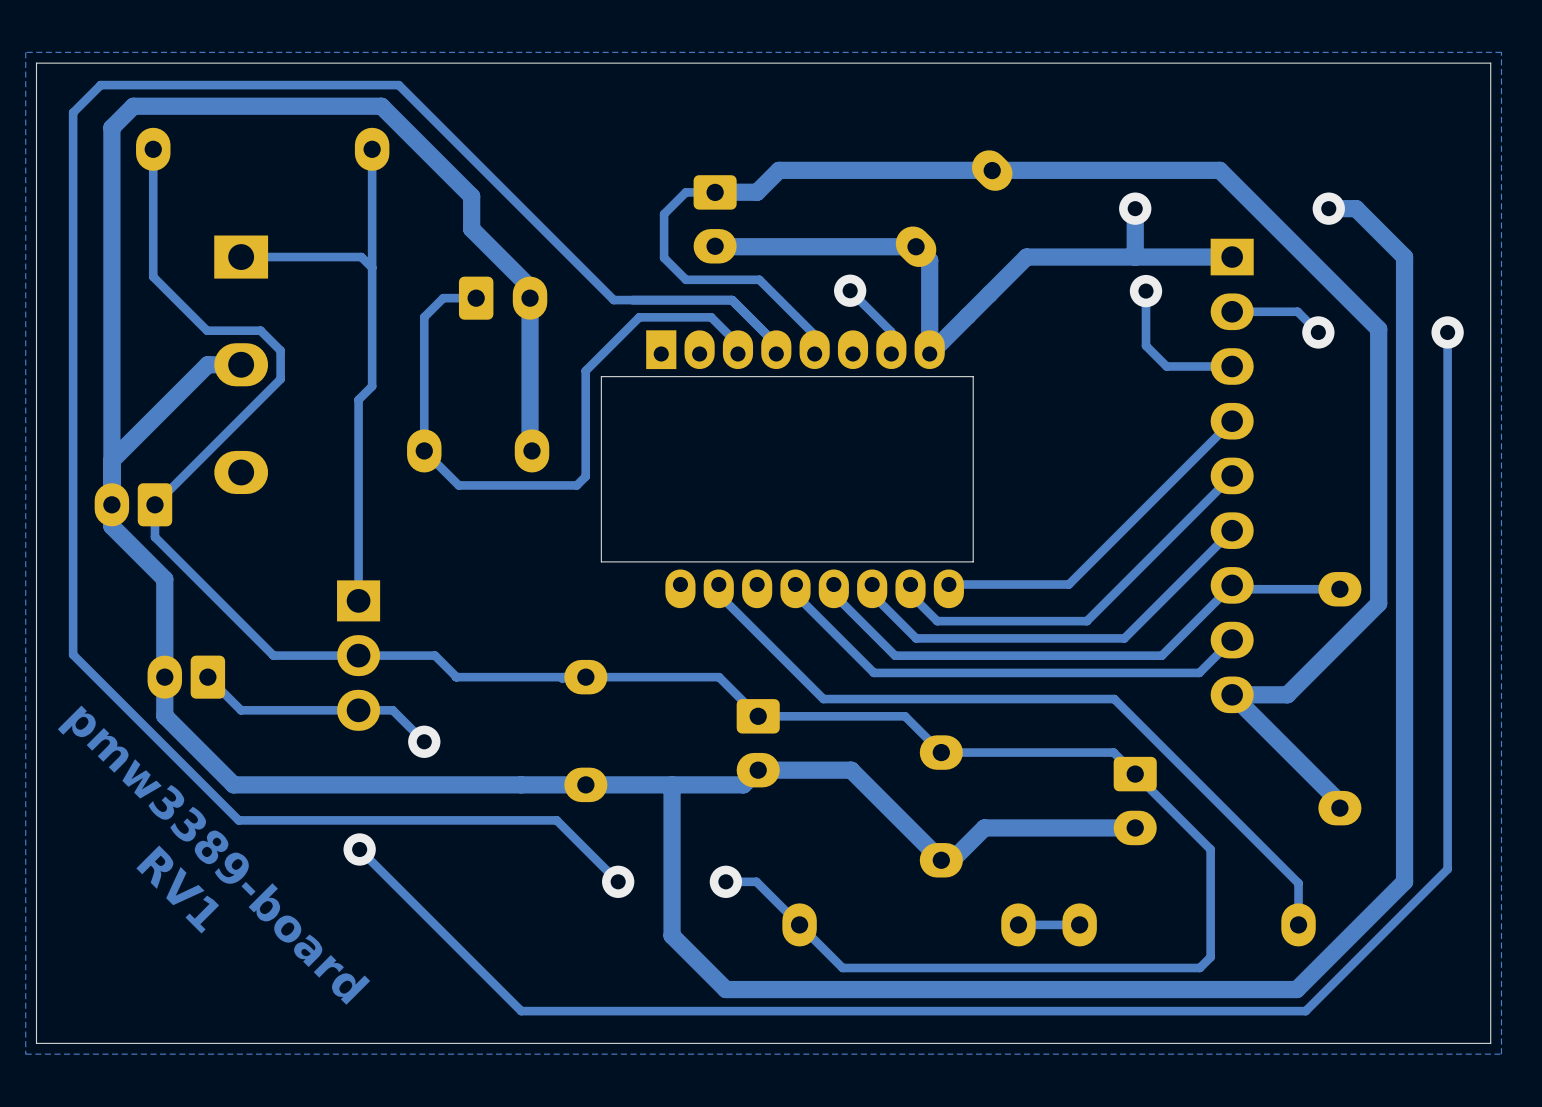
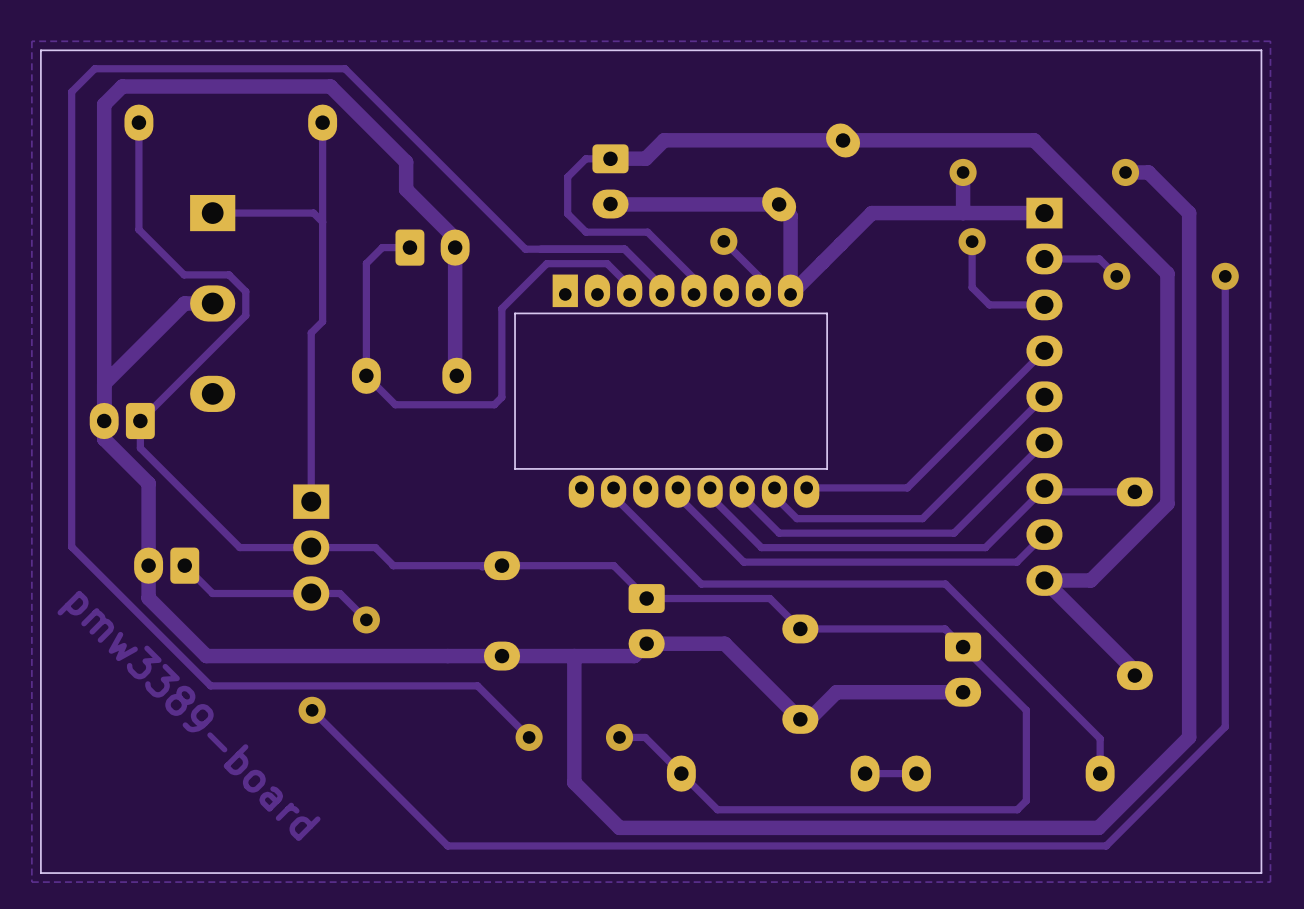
text: RV1 (177, 889) -> none

